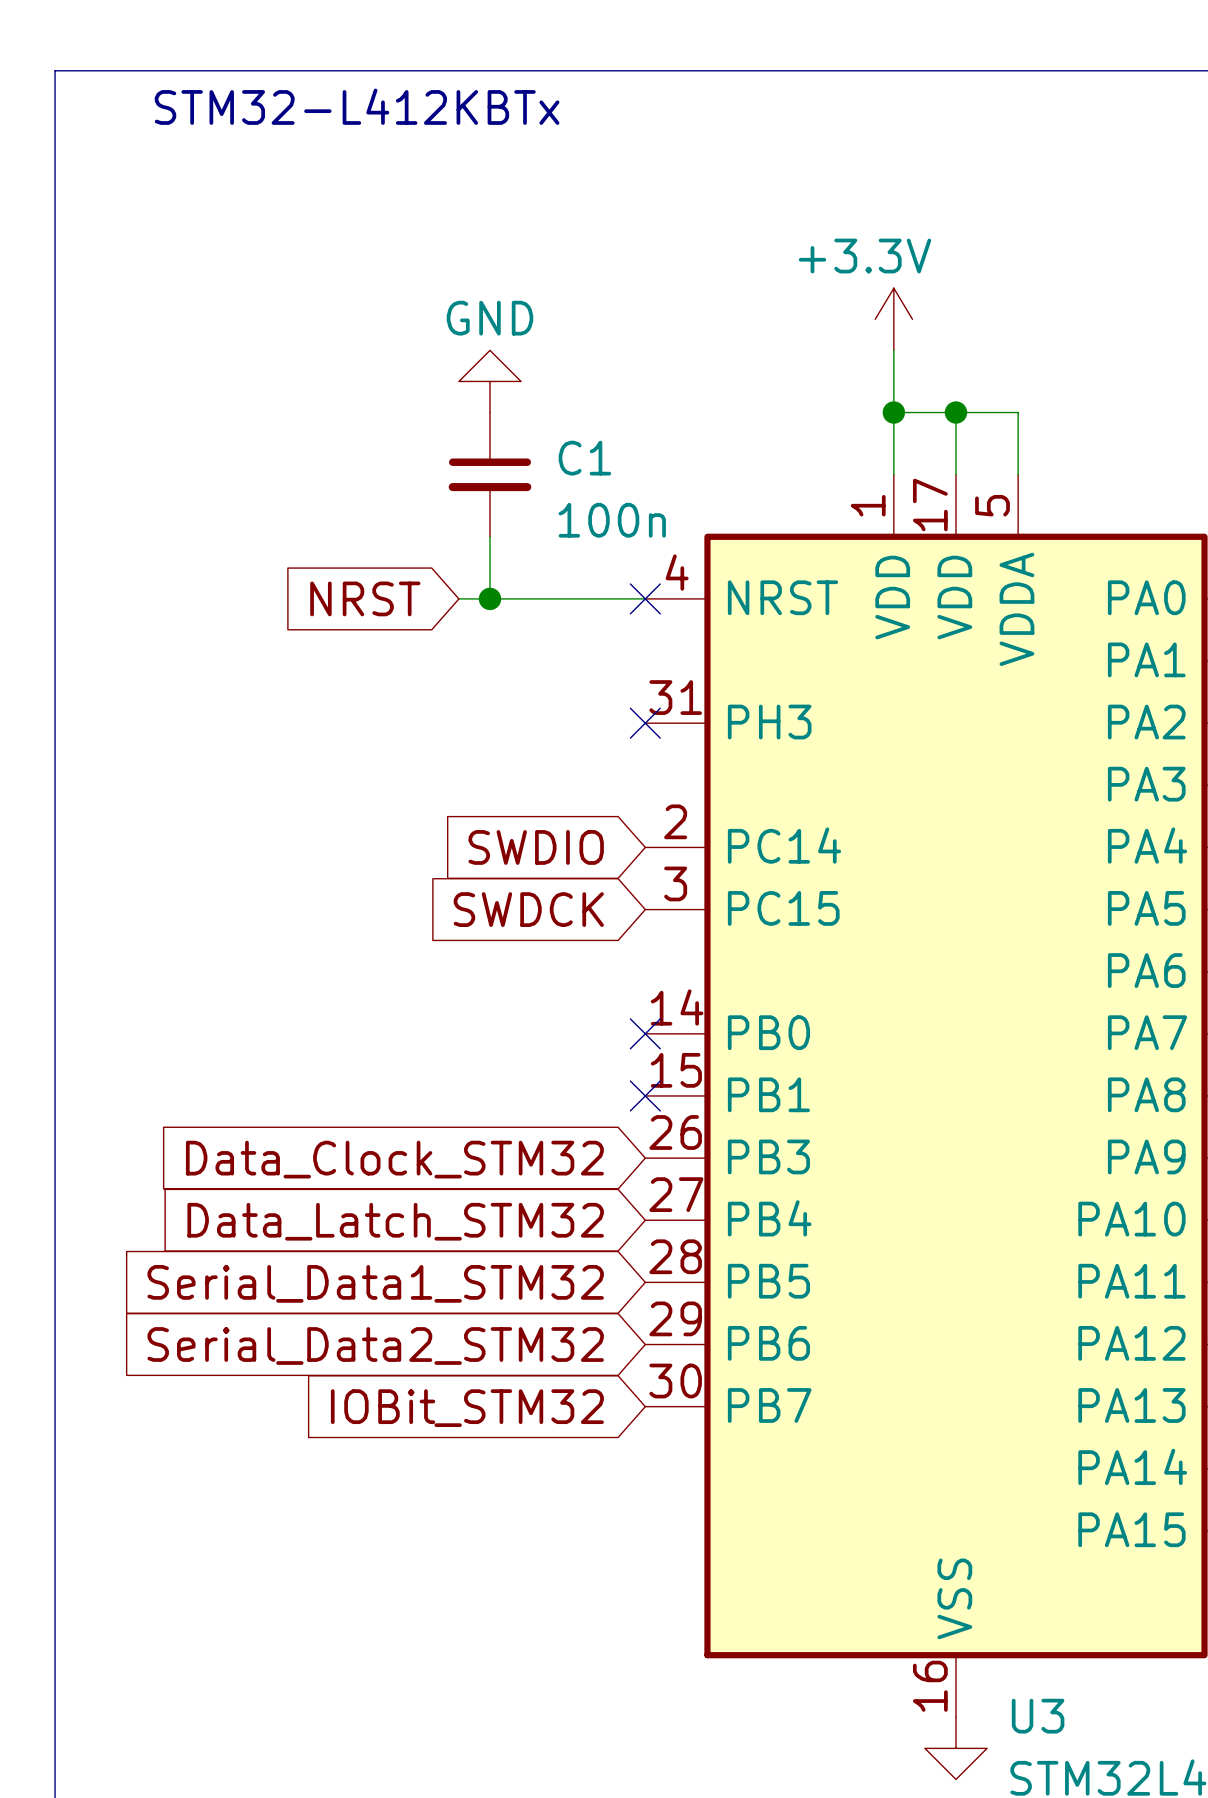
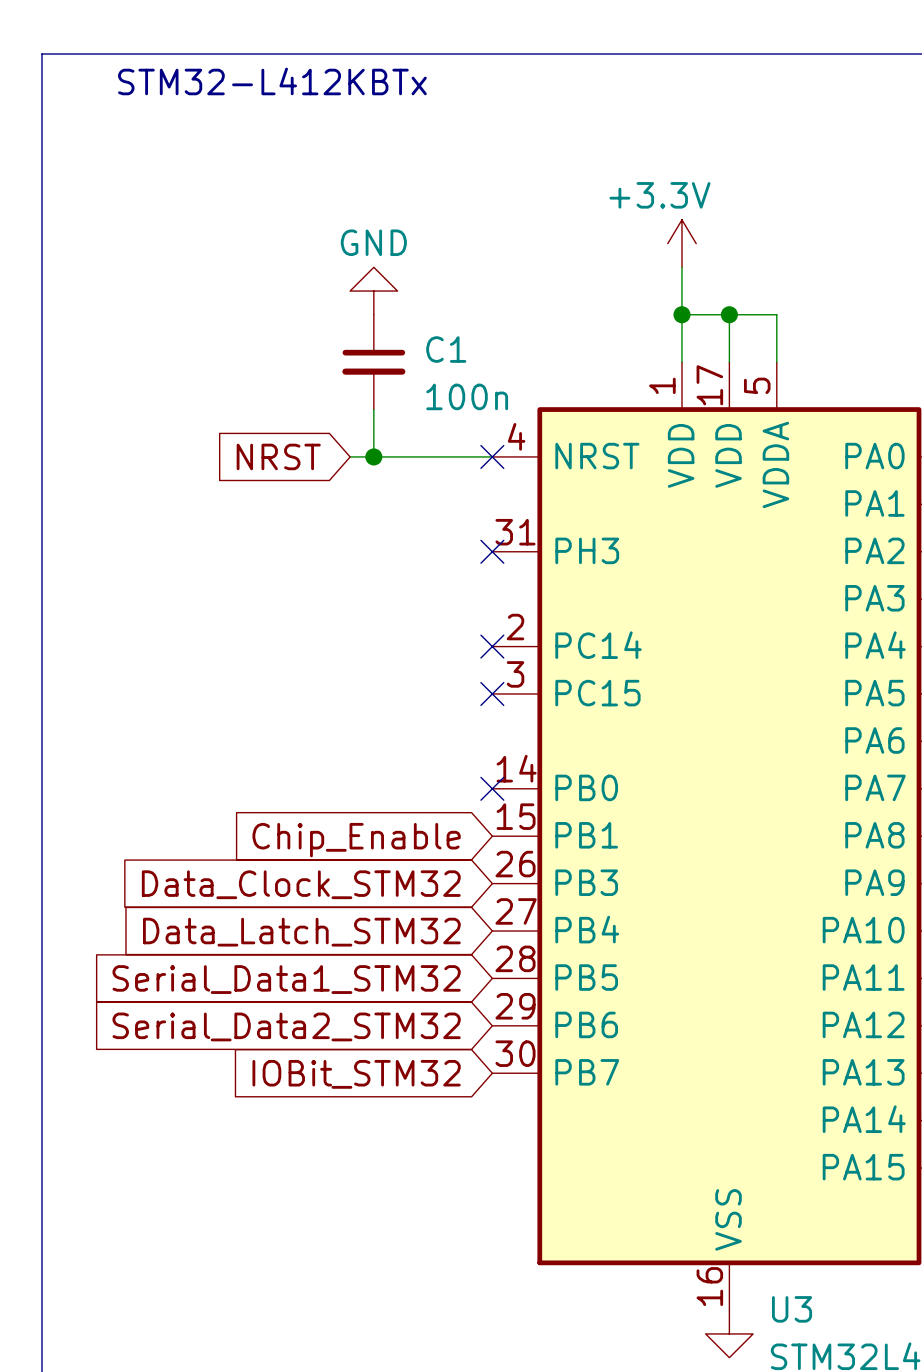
global label: SWDIO (536, 847) -> none
no-connect mark: none -> (492, 646)
global label: SWDCK (528, 909) -> none
no-connect mark: none -> (492, 693)
no-connect mark: (645, 1095) -> none
global label: none -> Chip_Enable (356, 840)

